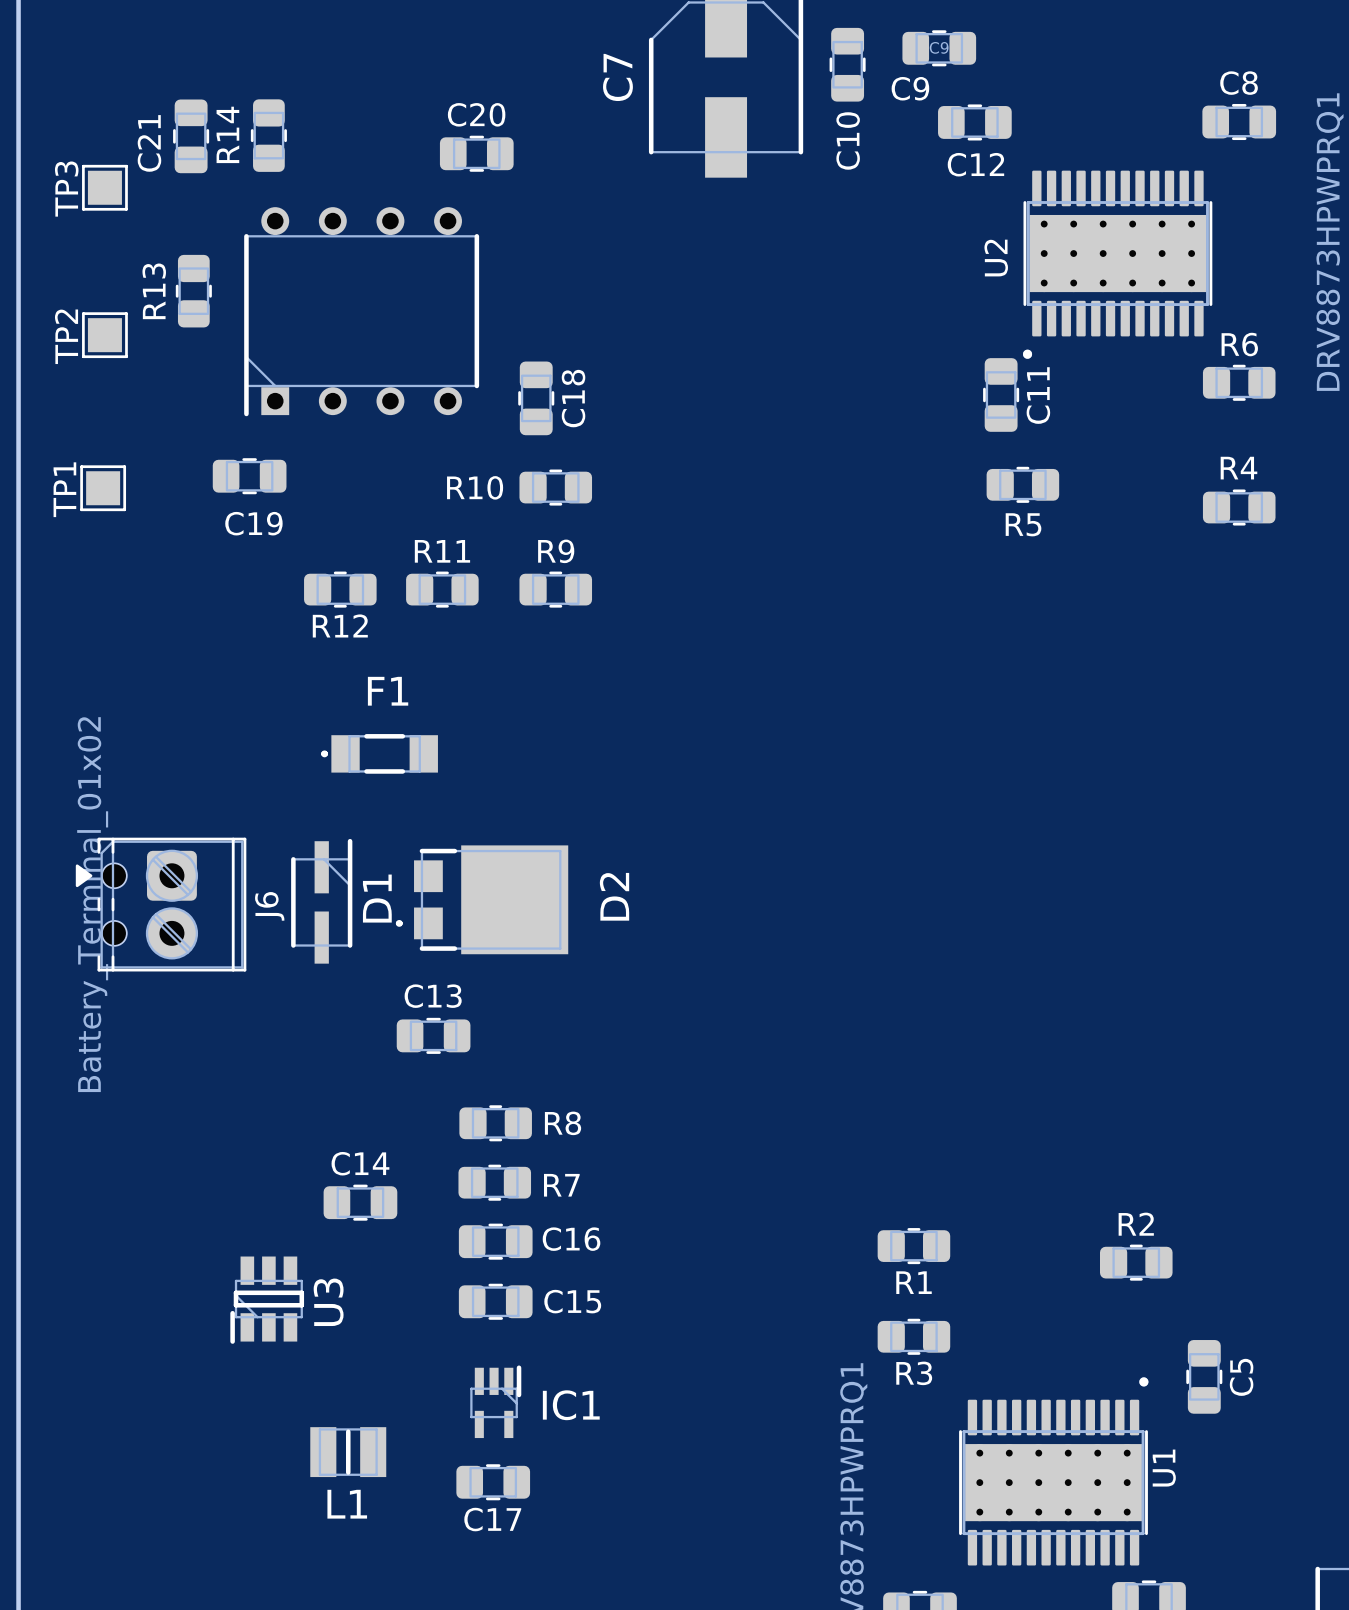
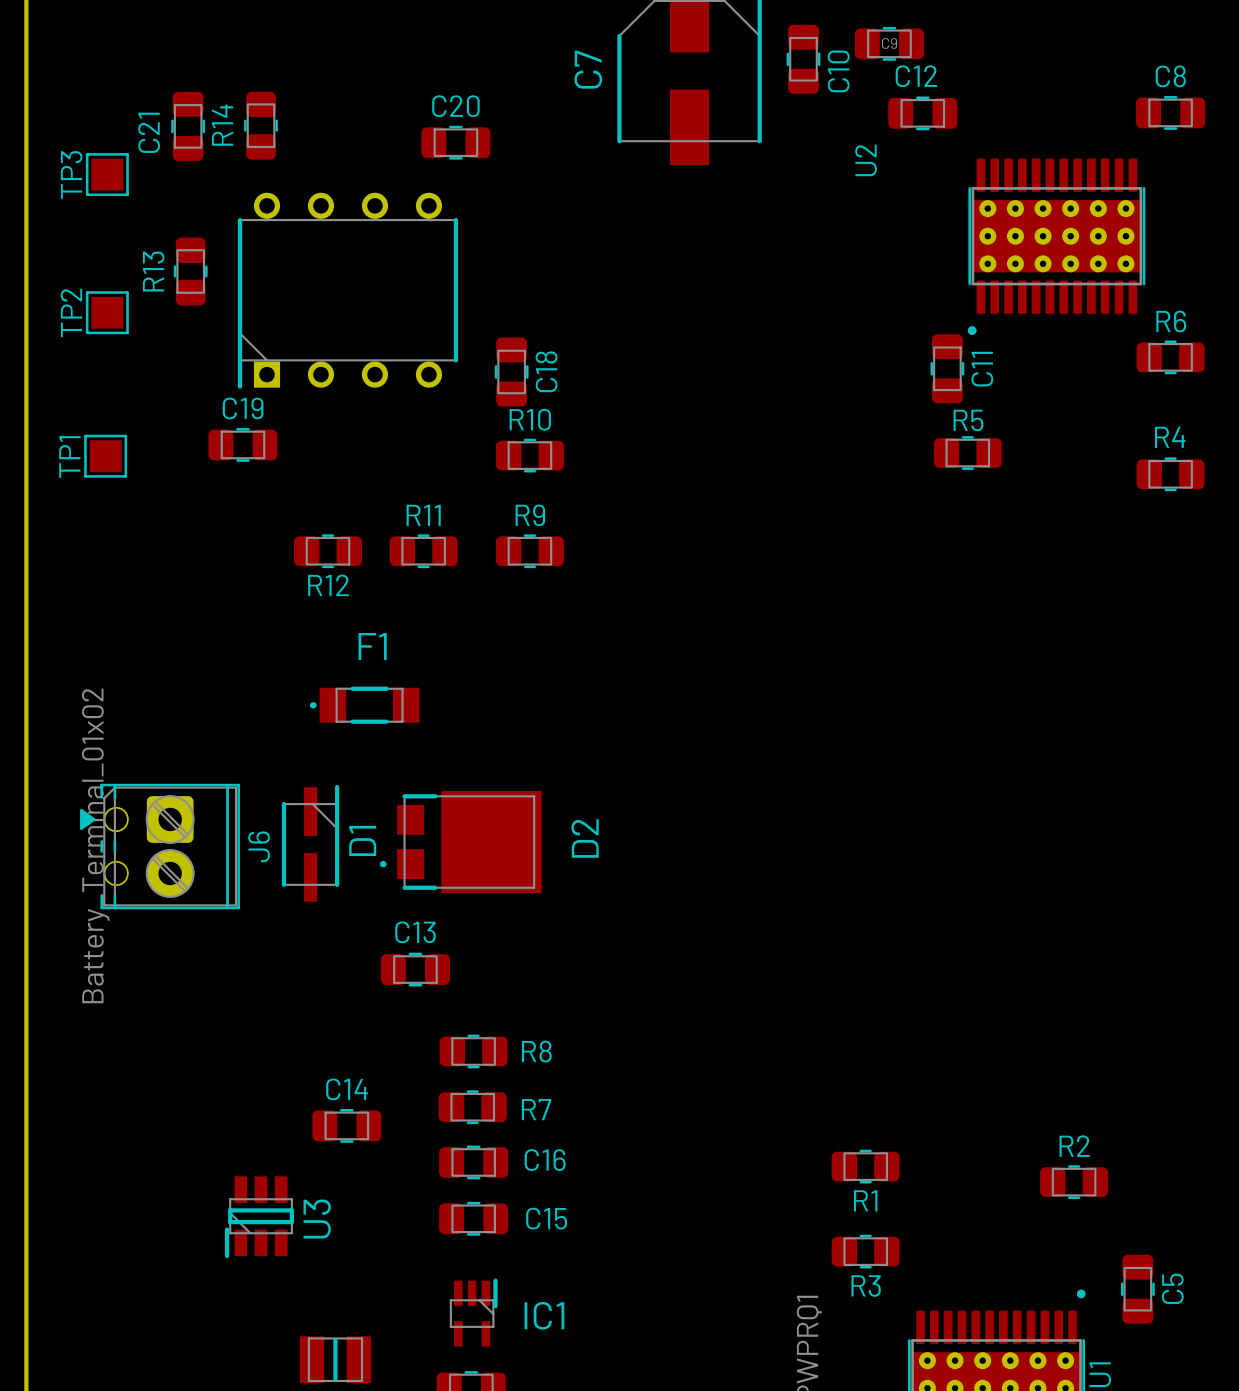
text: C9 (910, 88) -> none
C10 name position: C10 (848, 140) -> C10 (838, 71)
C12 name position: C12 (975, 164) -> C12 (916, 76)
U2 name position: U2 (996, 258) -> U2 (866, 160)
R10 name position: R10 (475, 487) -> R10 (530, 419)
C19 name position: C19 (253, 523) -> C19 (243, 408)
R5 name position: R5 (1023, 524) -> R5 (968, 420)

